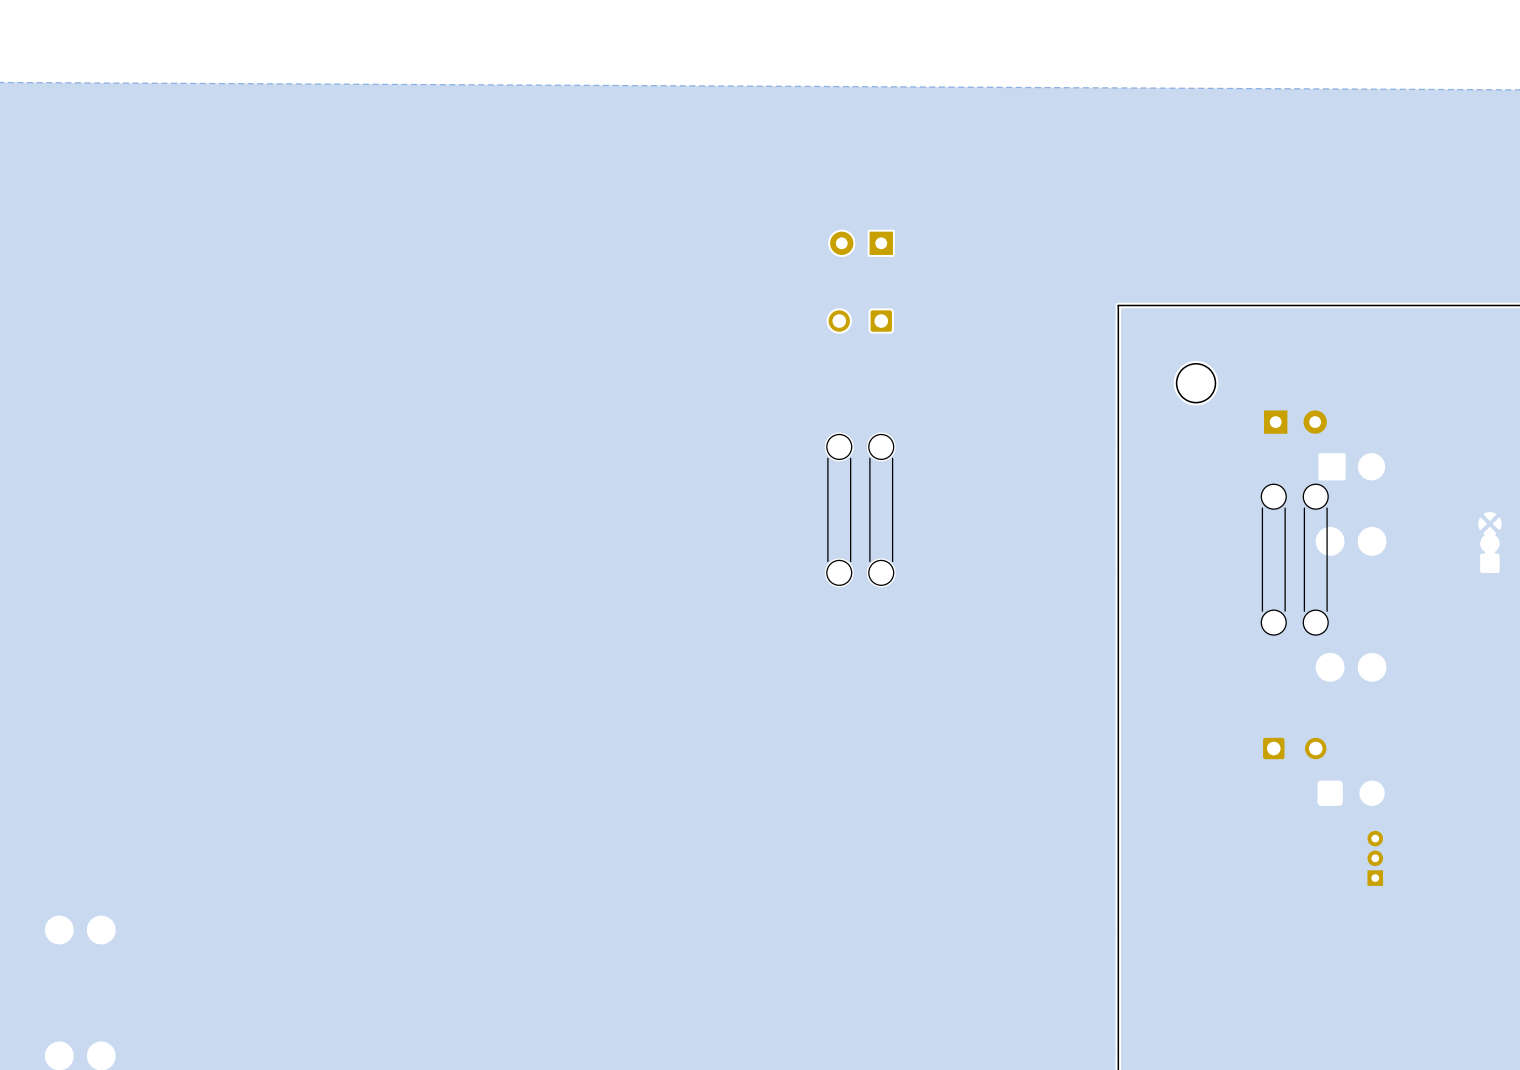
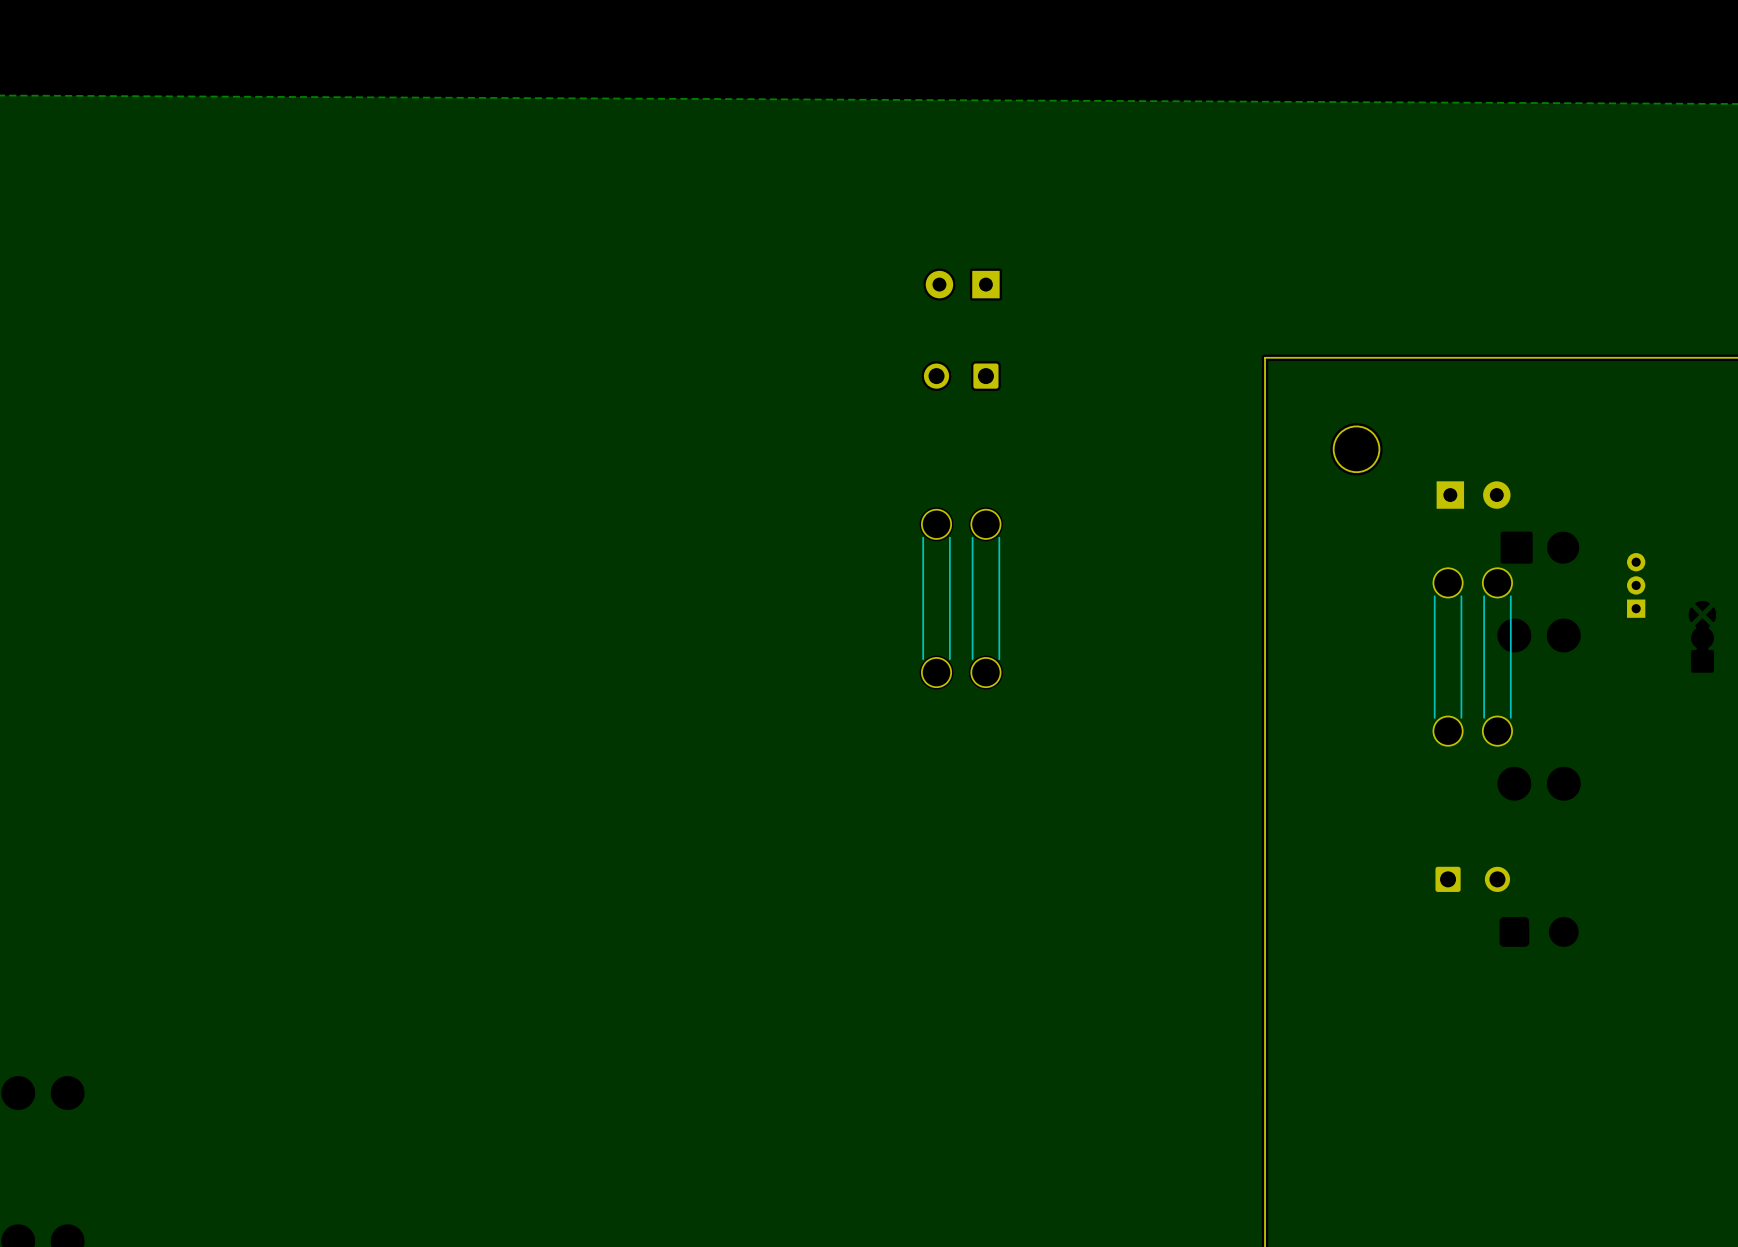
part: none -> (1636, 585)
part: (1375, 858) -> none

